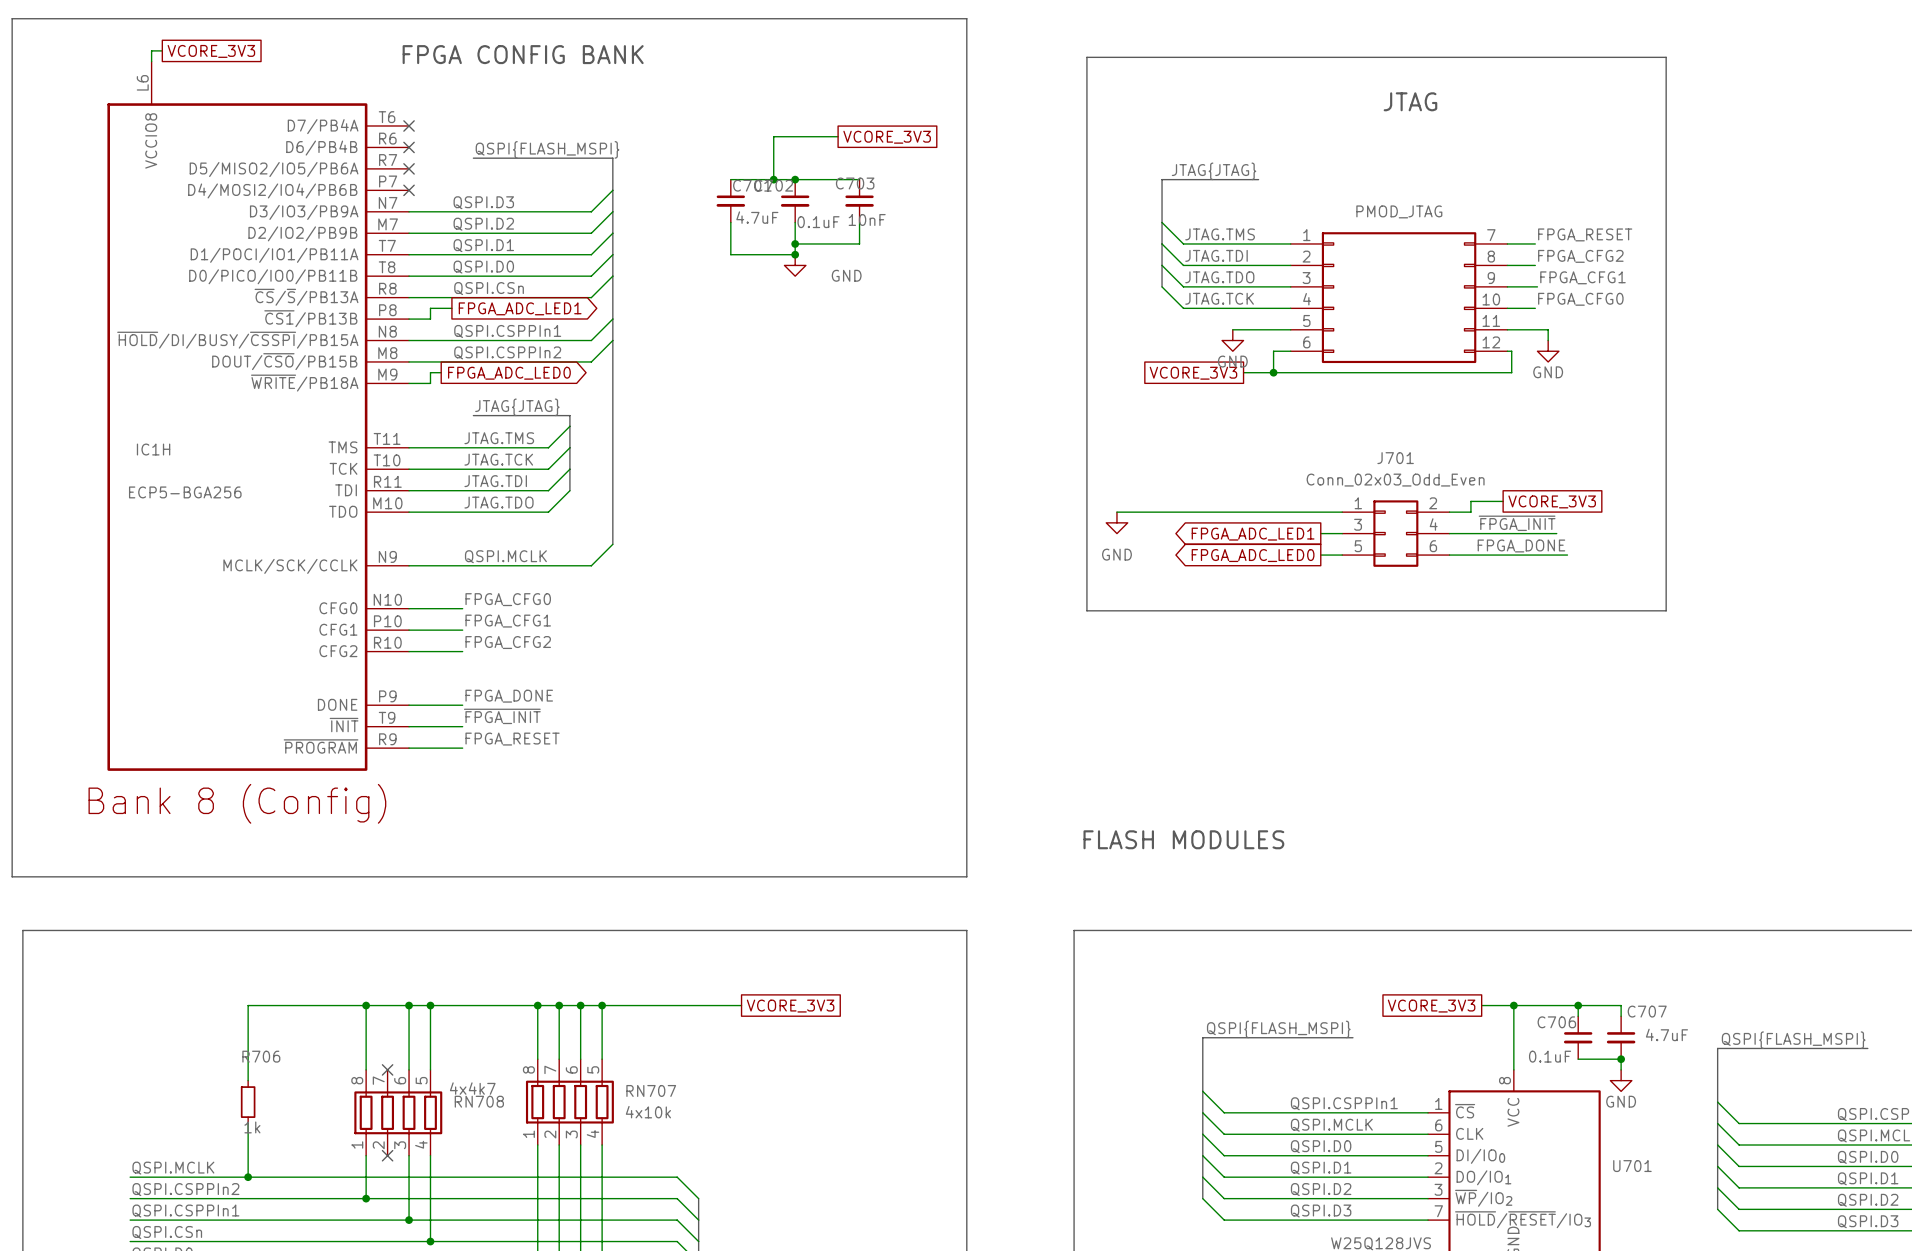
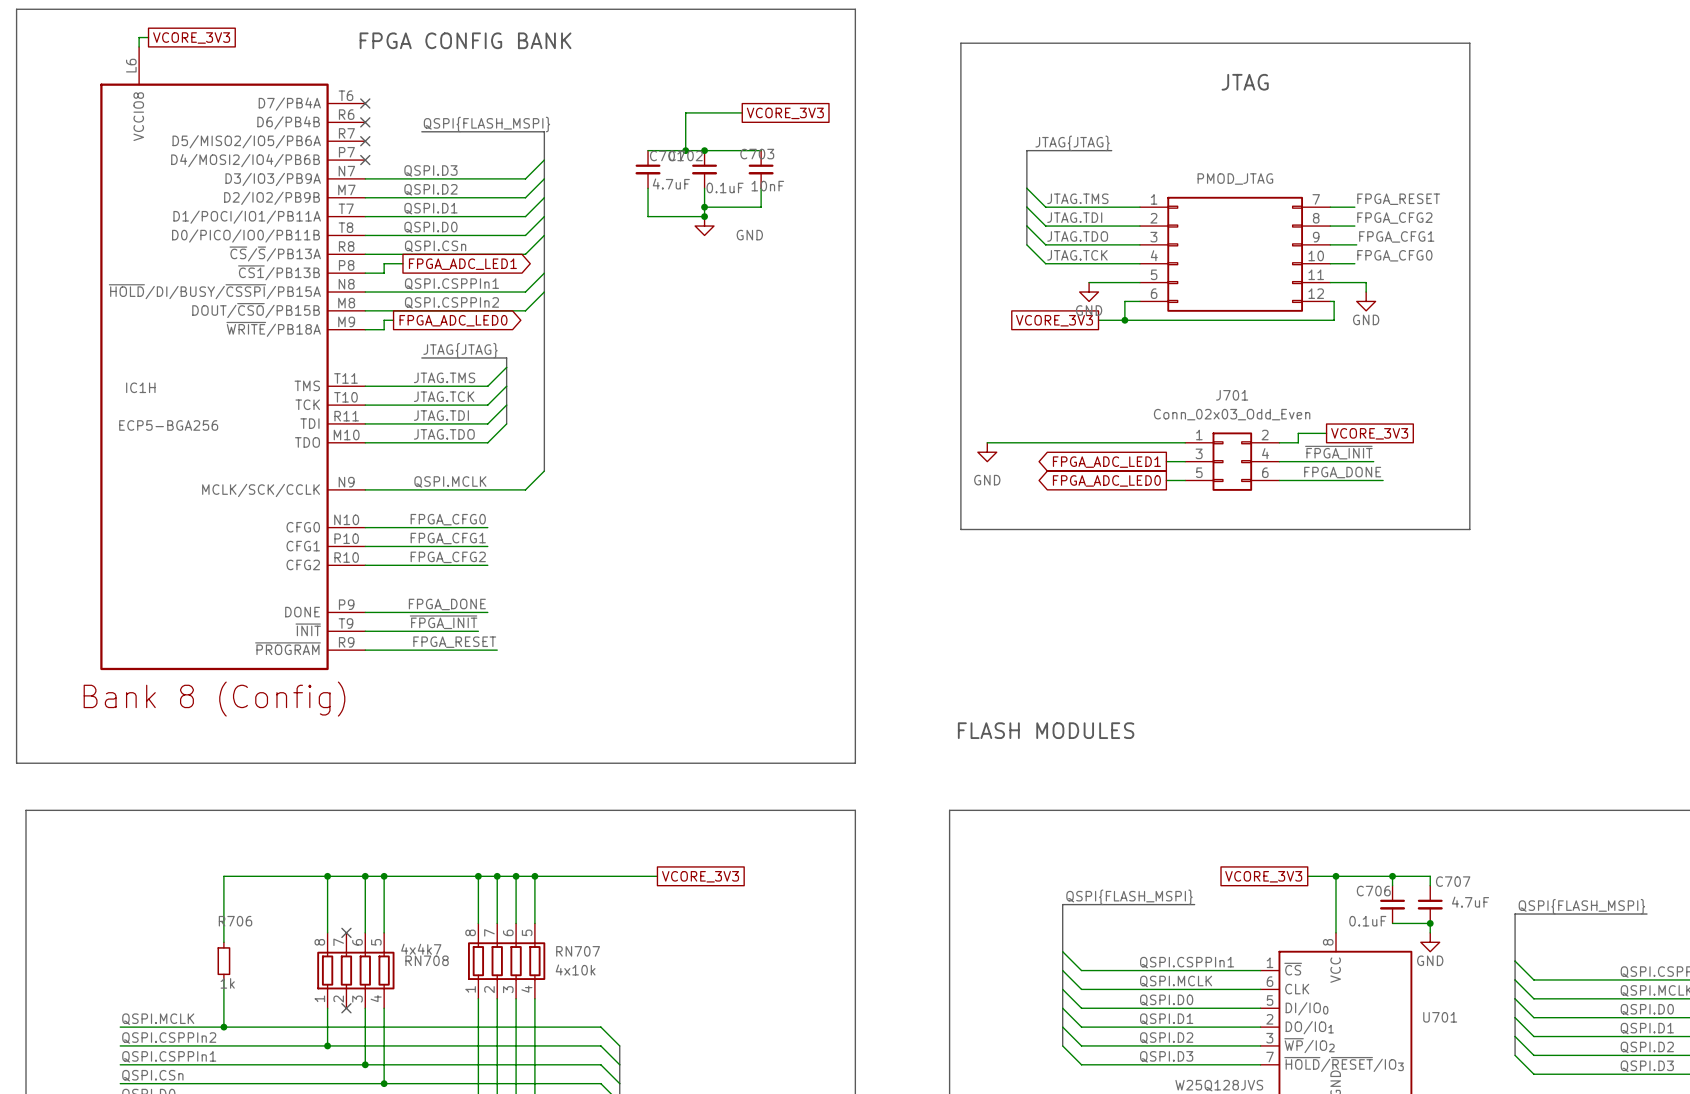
label position: FPGA_CFG0 (508, 599) -> FPGA_CFG0 (448, 519)
wire: none -> (412, 527) (487, 527)
label position: FPGA_CFG1 (508, 621) -> FPGA_CFG1 (448, 538)
wire: none -> (412, 546) (487, 546)
label position: FPGA_CFG2 (508, 642) -> FPGA_CFG2 (448, 557)
wire: none -> (412, 565) (487, 565)
label position: FPGA_DONE (509, 696) -> FPGA_DONE (447, 604)
wire: none -> (412, 612) (487, 612)
label position: ~{FPGA_INIT} (502, 716) -> ~{FPGA_INIT} (443, 622)
wire: none -> (412, 631) (478, 631)
label position: FPGA_RESET (512, 739) -> FPGA_RESET (454, 642)
wire: none -> (412, 650) (497, 650)

